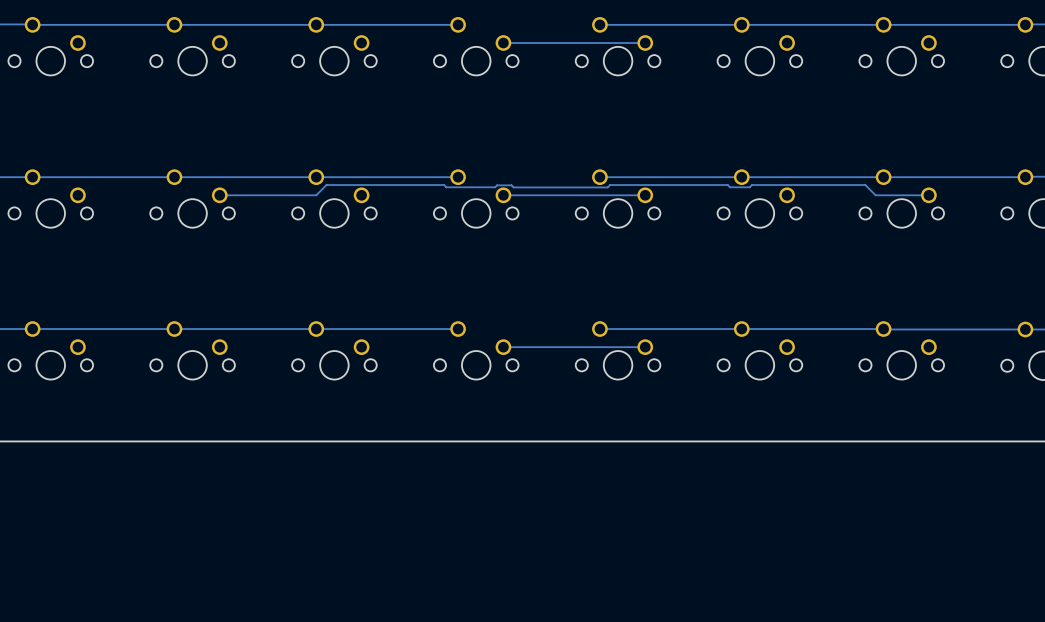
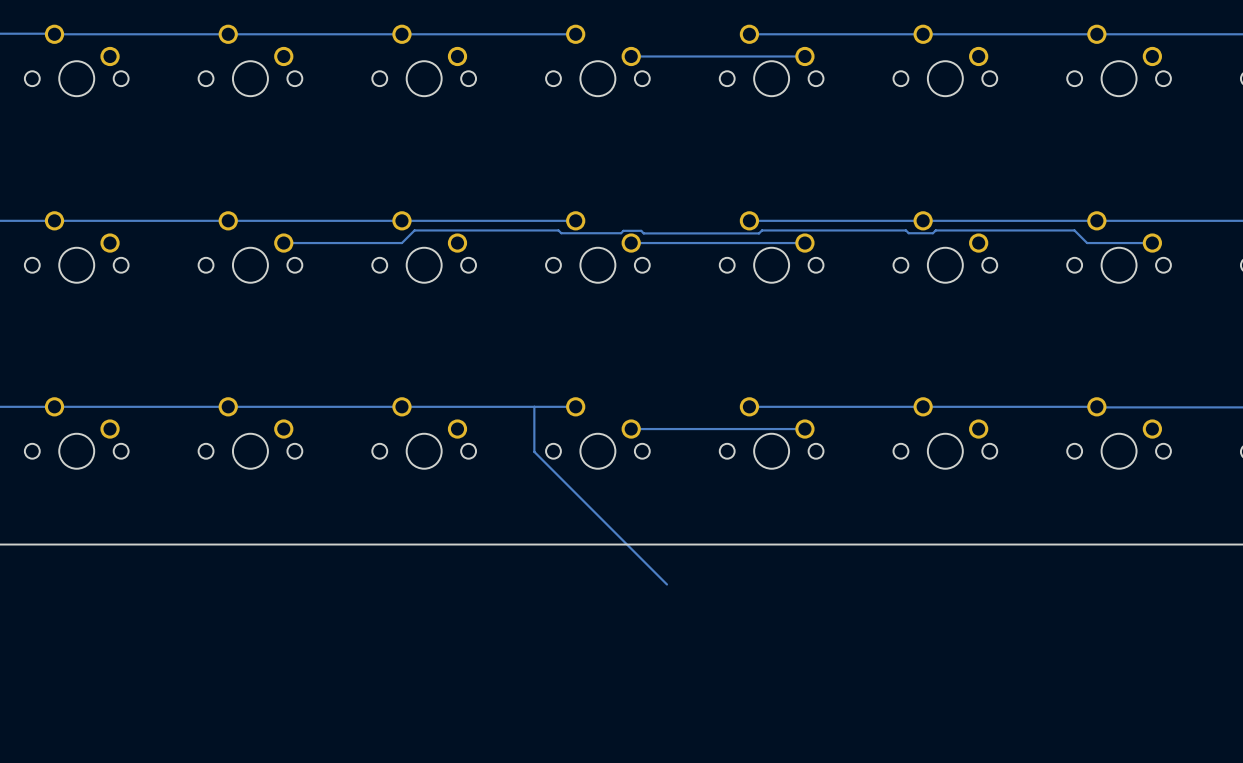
track: none -> (534, 406) (534, 451) (666, 584)

